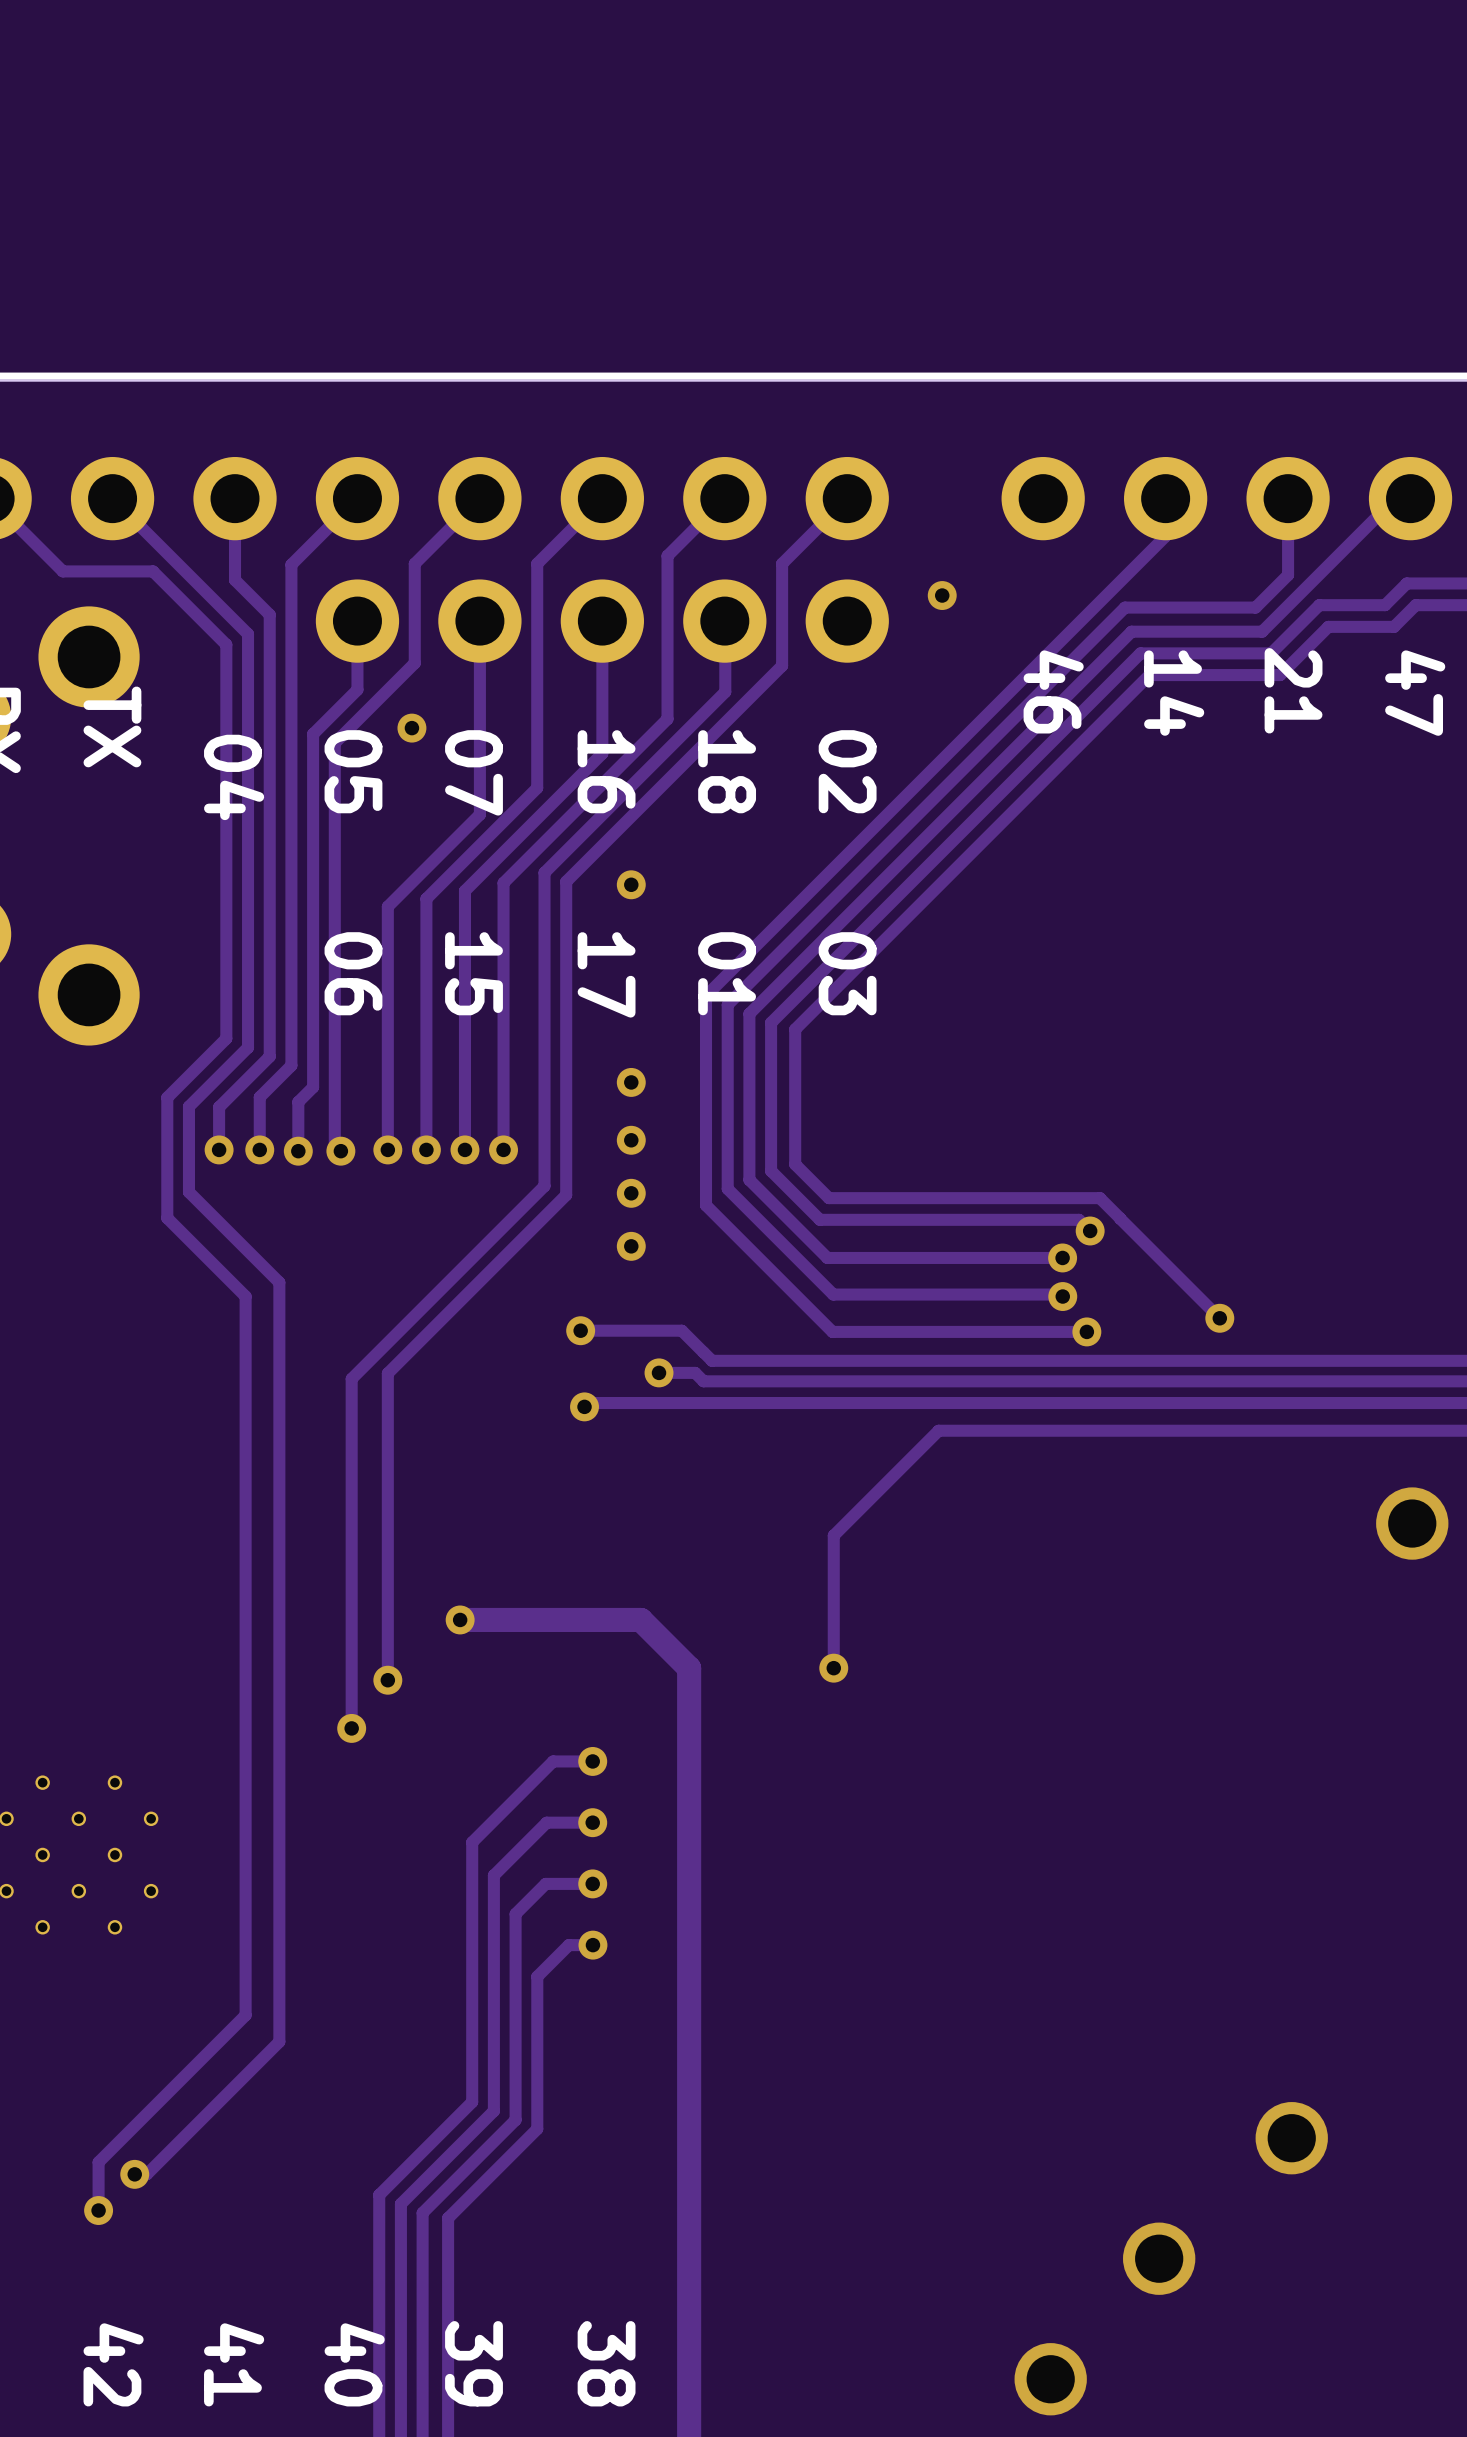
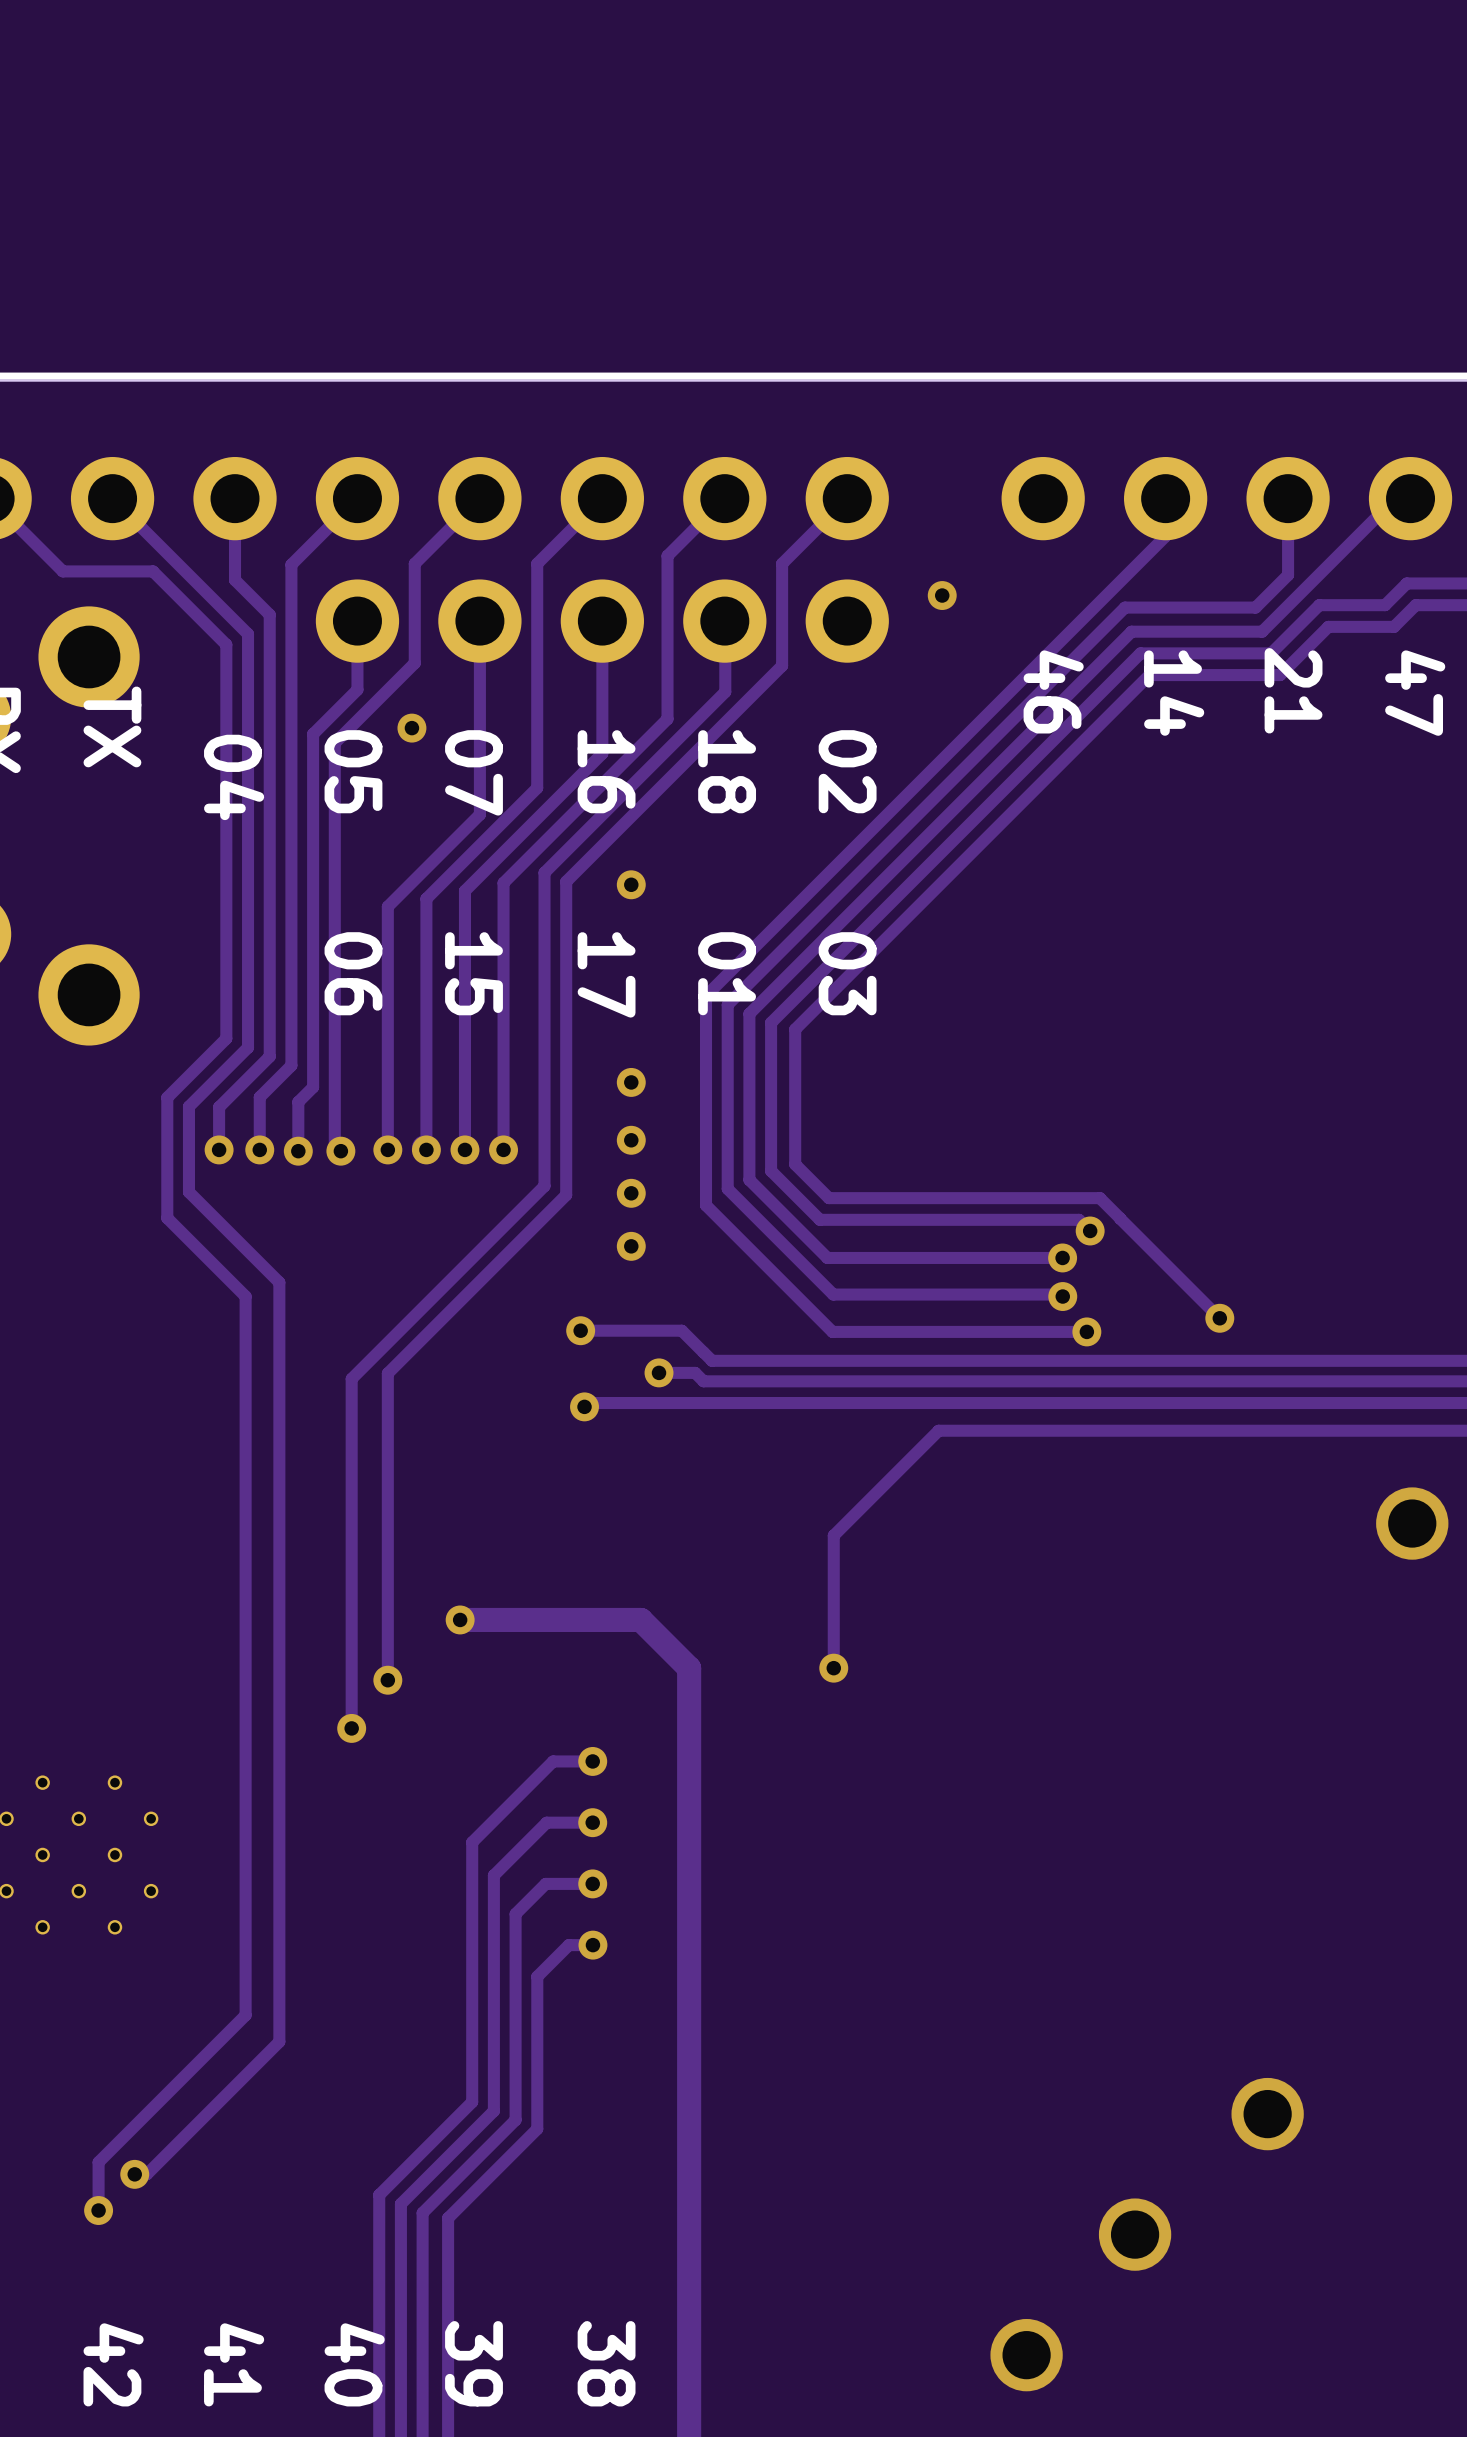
via position: (1291, 2138) -> (1267, 2114)
via position: (1159, 2258) -> (1135, 2234)
via position: (1050, 2379) -> (1026, 2355)

